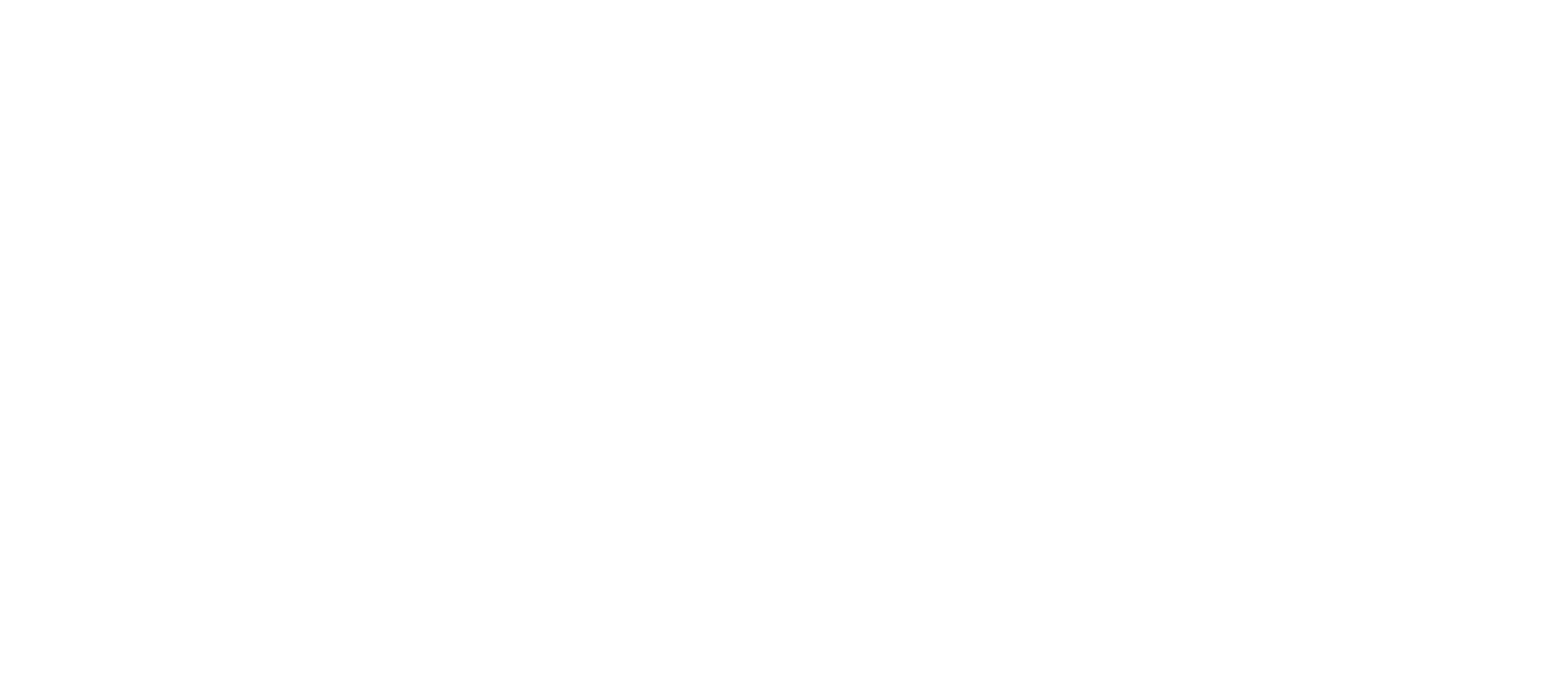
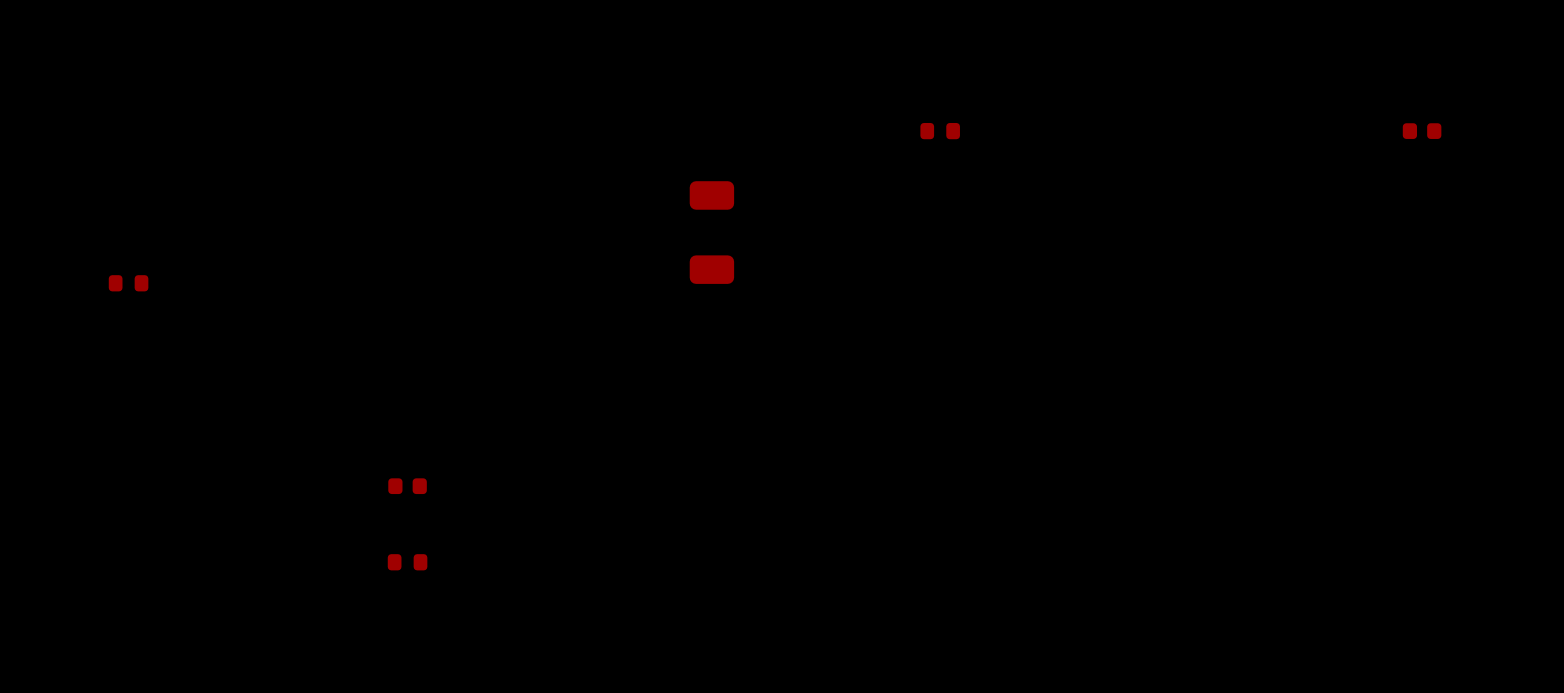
part: none -> (940, 131)
part: none -> (1422, 131)
part: none -> (711, 232)
part: none -> (128, 283)
part: none -> (407, 486)
part: none -> (407, 562)

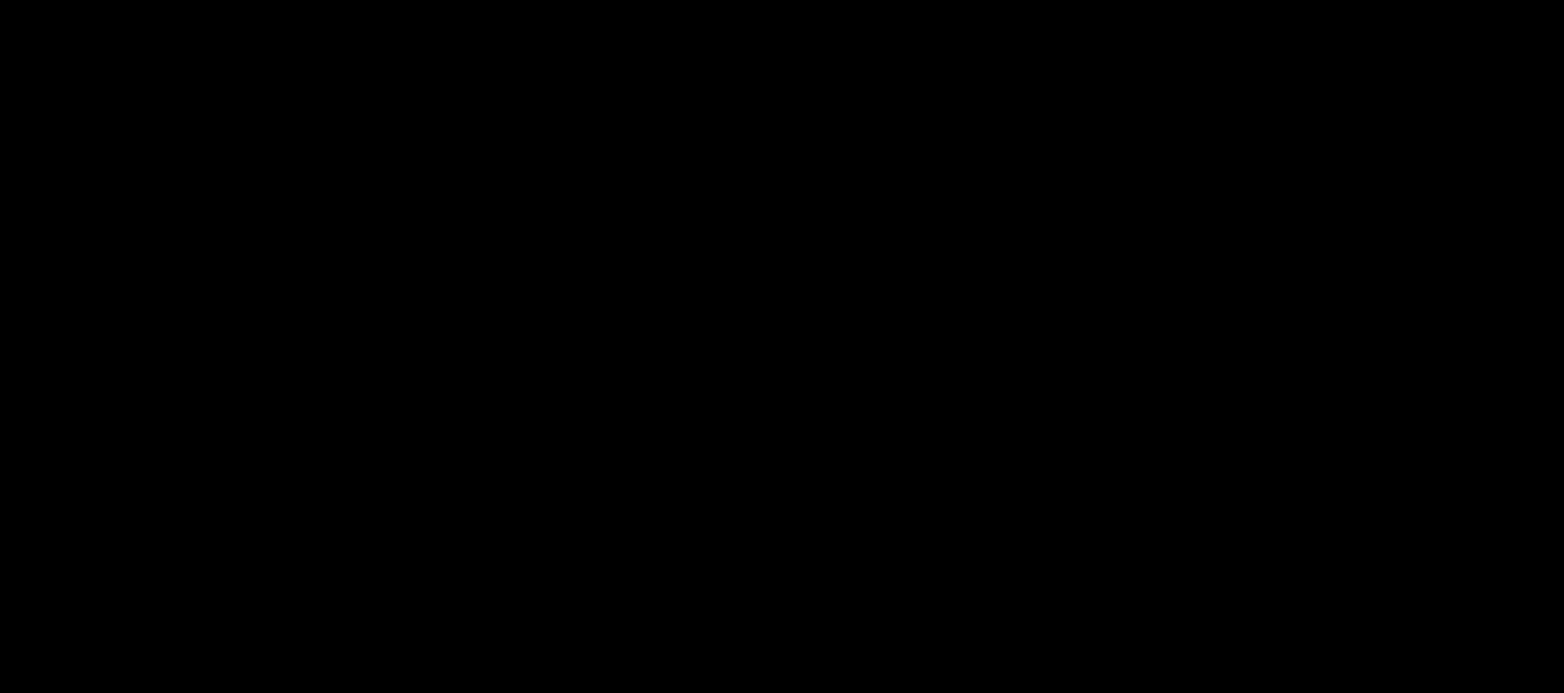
part: (940, 131) -> none
part: (1422, 131) -> none
part: (711, 232) -> none
part: (128, 283) -> none
part: (407, 486) -> none
part: (407, 562) -> none

